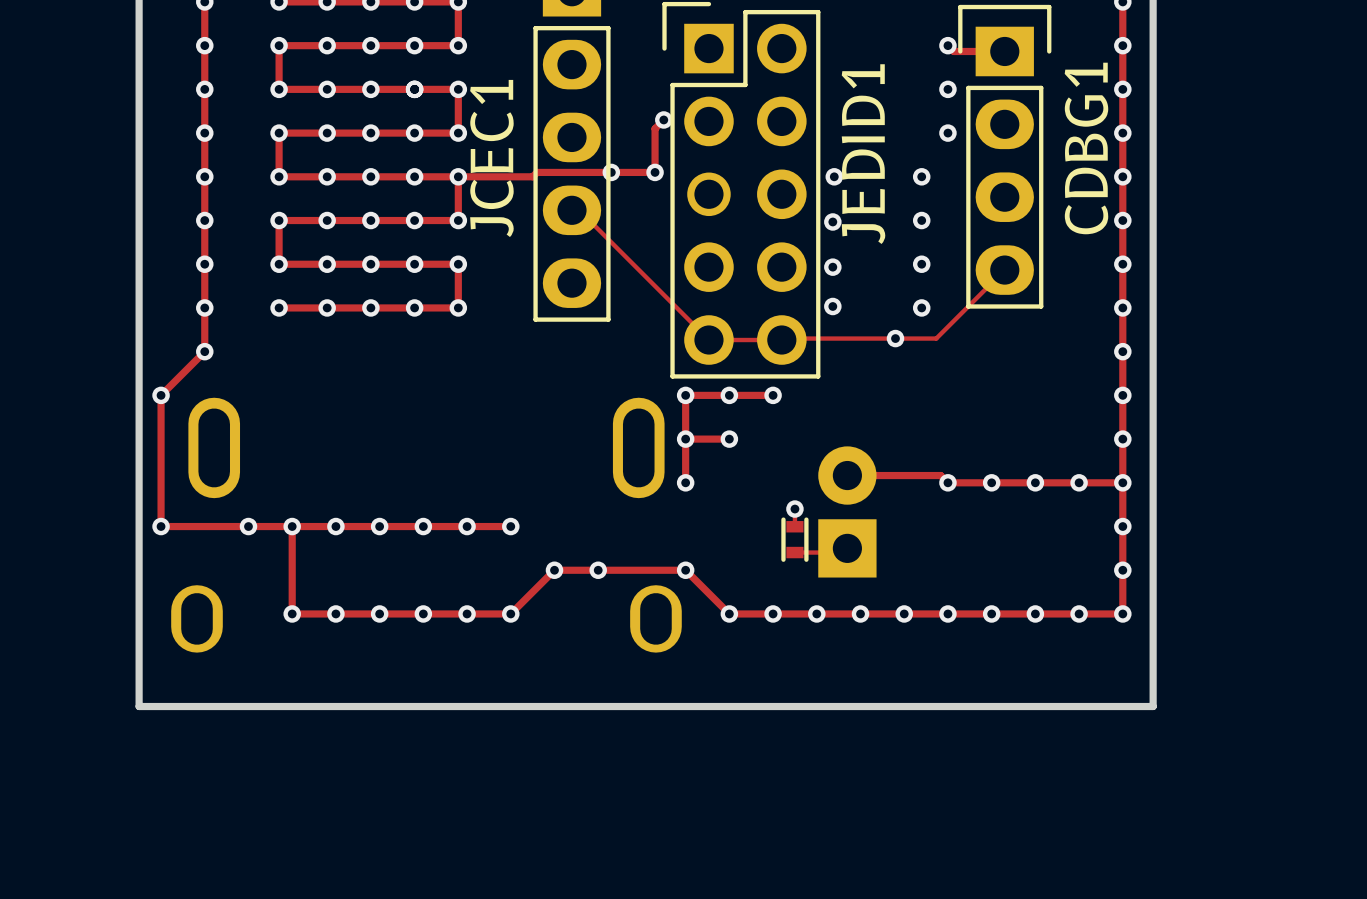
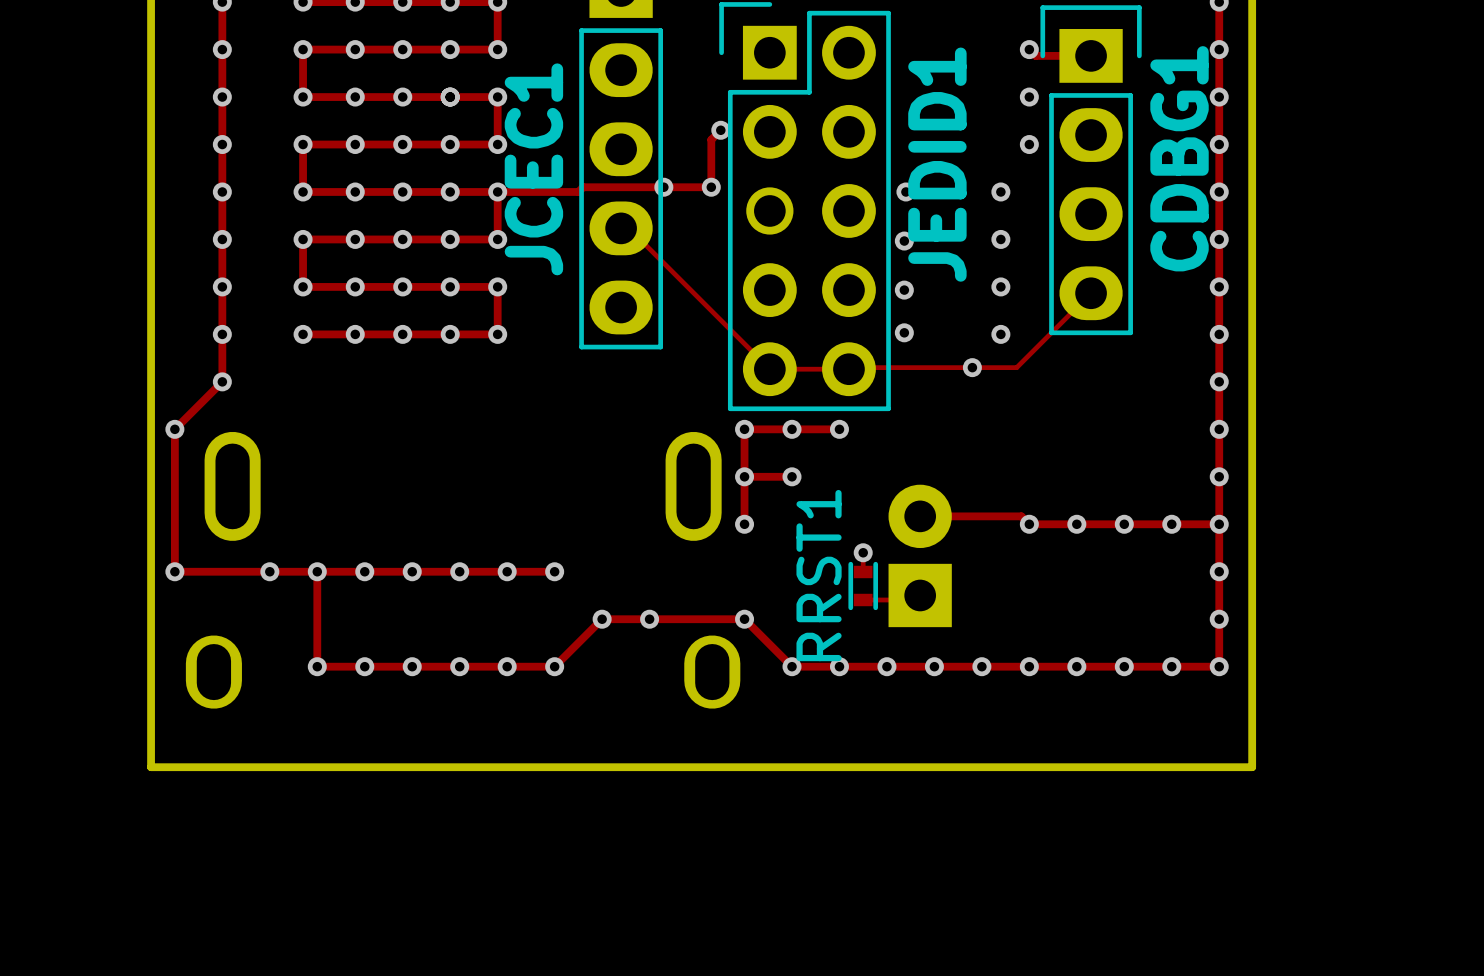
RRST1 name: none -> RRST1 (819, 575)

